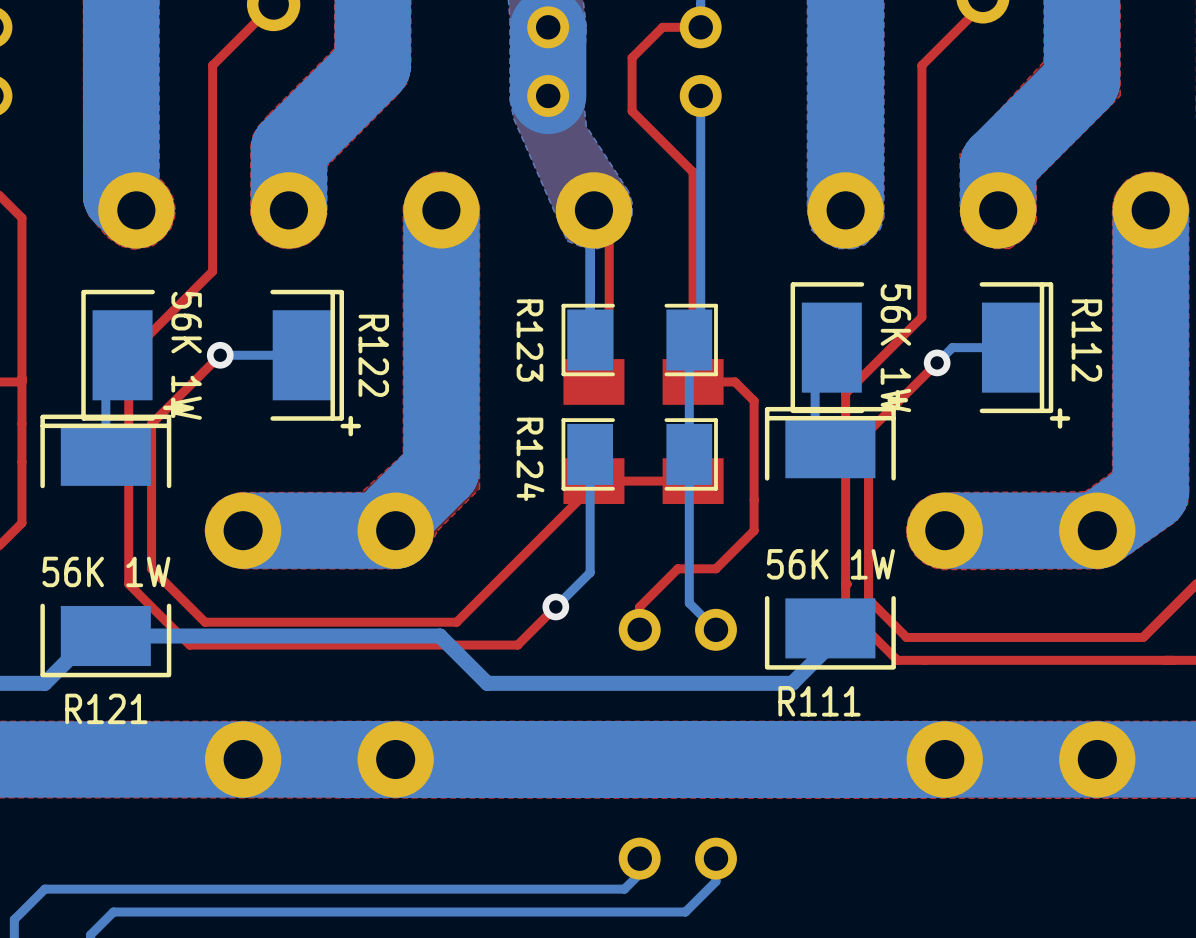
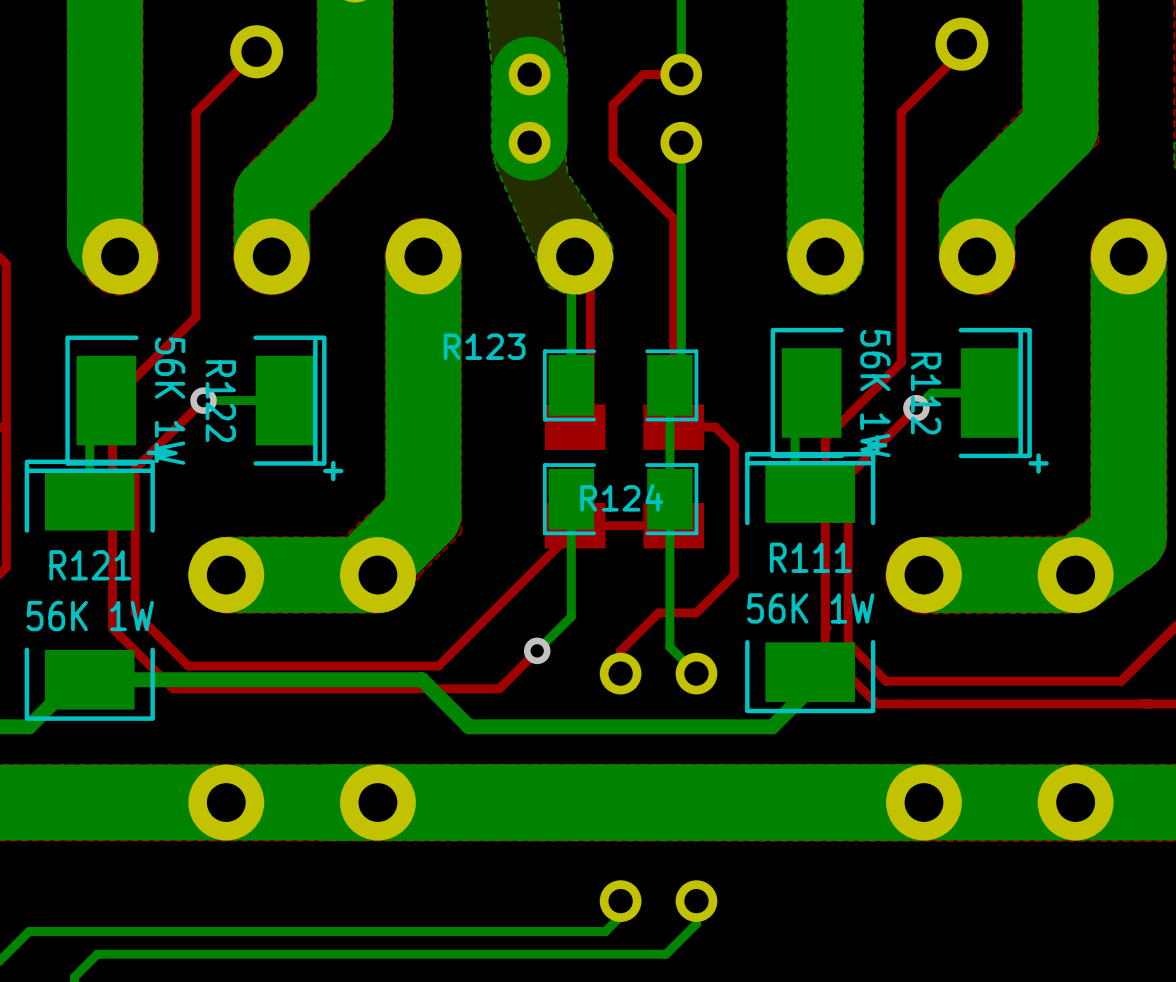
R123 name rotation: 0° (529, 340) -> 90° counterclockwise (484, 346)
R112 name position: R112 (1086, 340) -> R112 (926, 393)
R122 name position: R122 (373, 355) -> R122 (220, 401)
R124 name rotation: 0° (530, 459) -> 90° counterclockwise (621, 497)
R124 name position: R124 (530, 459) -> R124 (621, 497)
R111 name position: R111 (819, 701) -> R111 (810, 557)
R121 name position: R121 (106, 708) -> R121 (90, 565)

